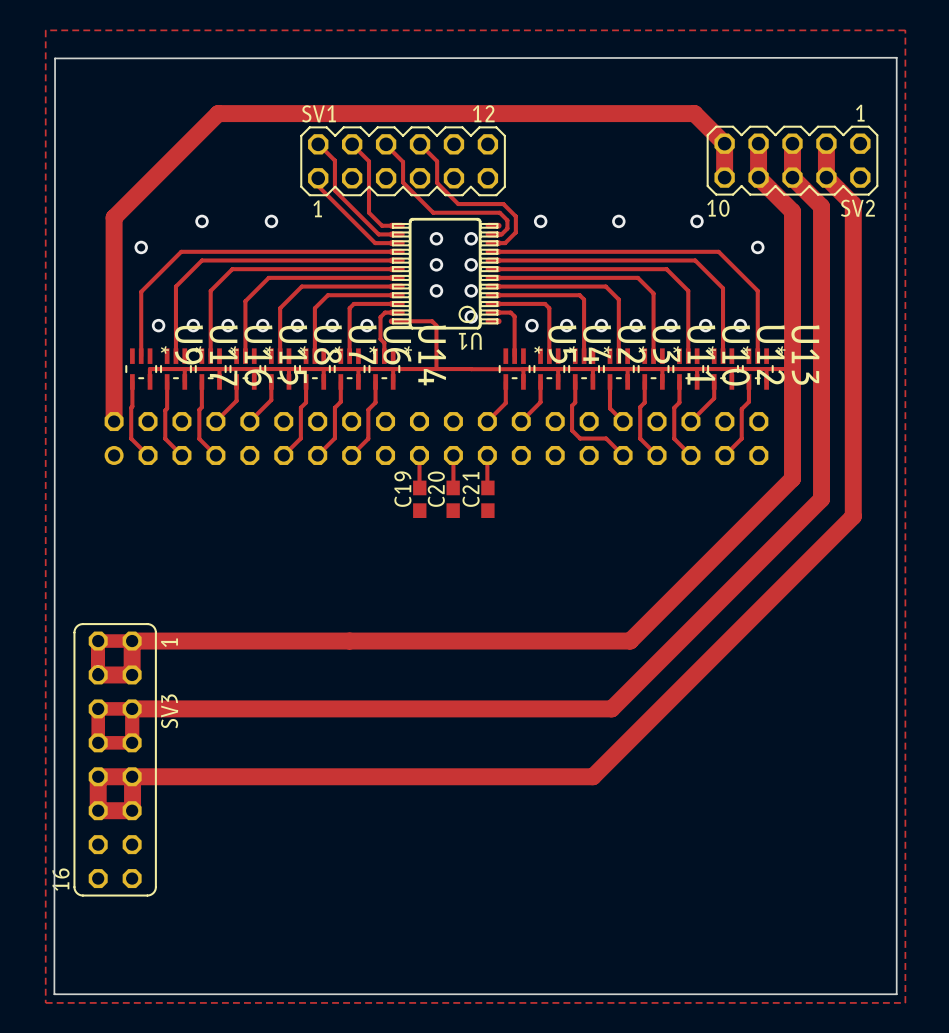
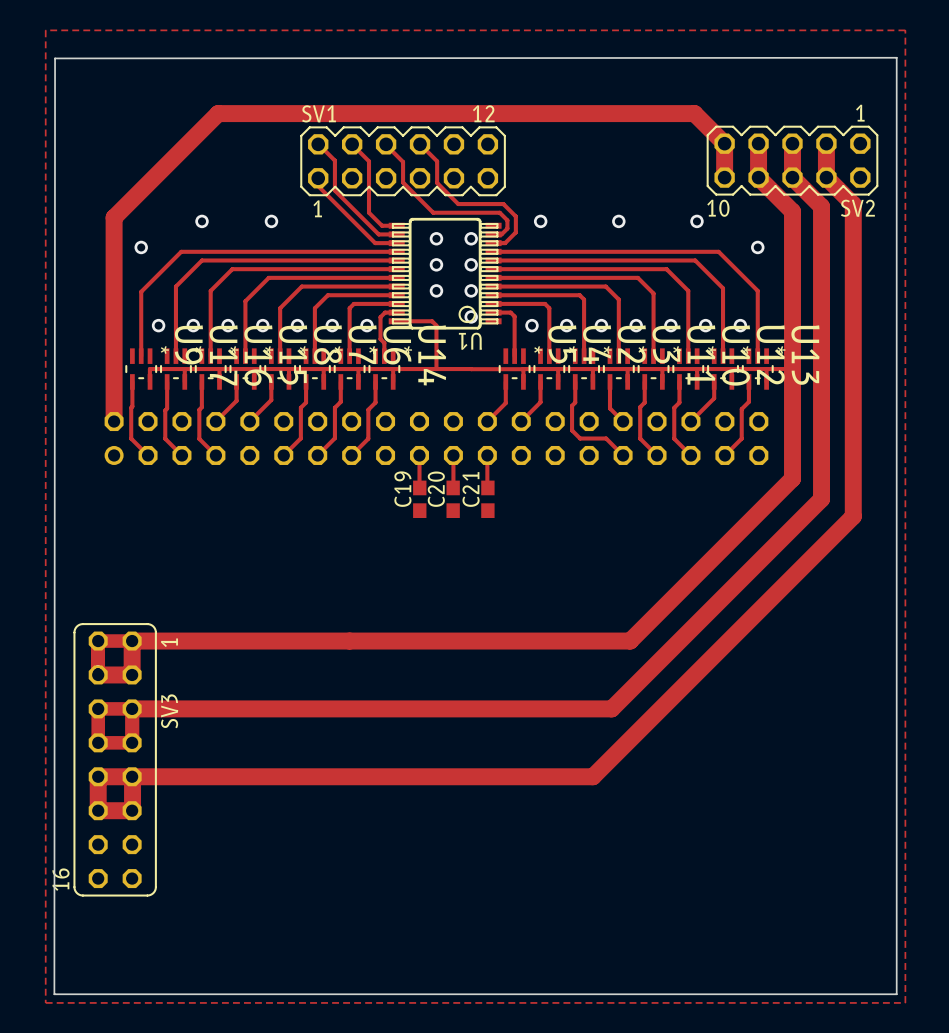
U1 footprint: [388, 217, 502, 330] -> [388, 217, 502, 330]

